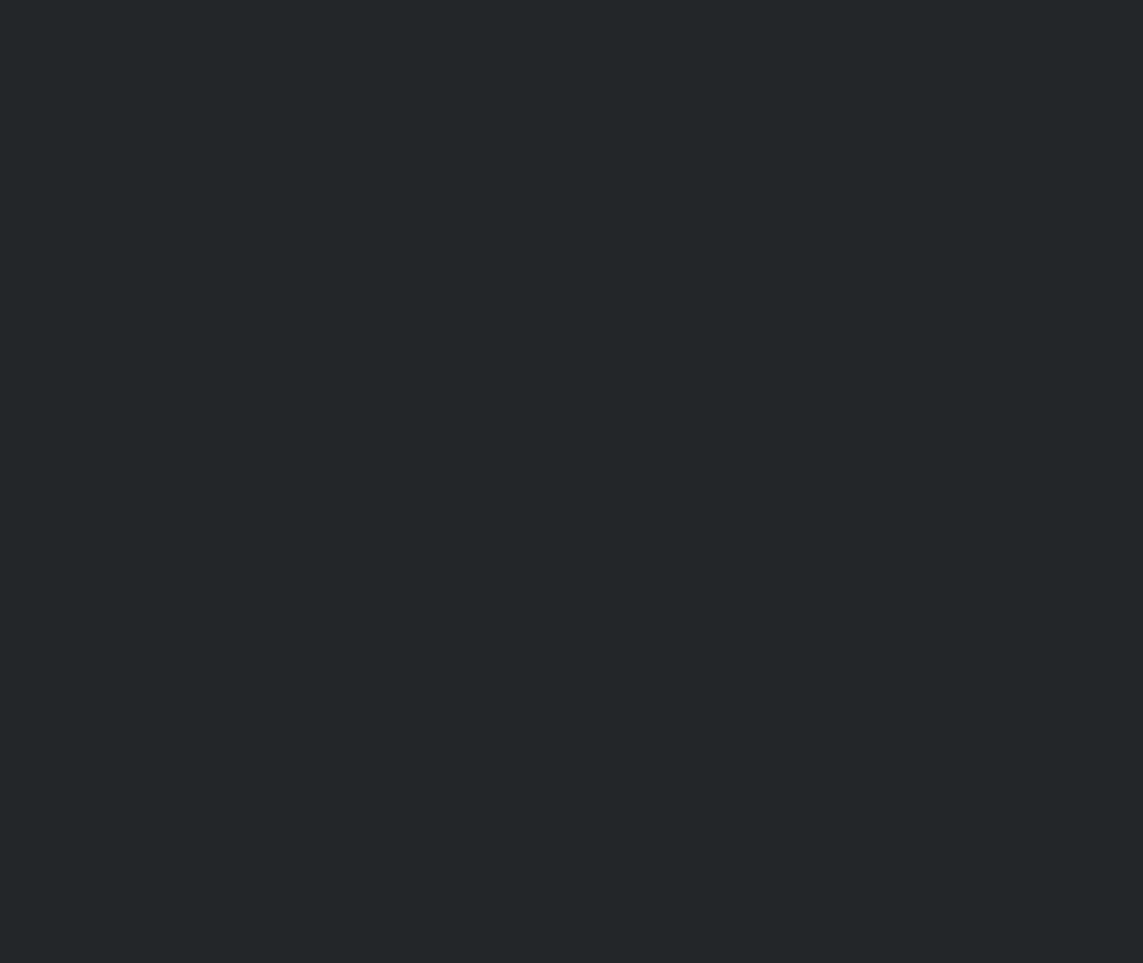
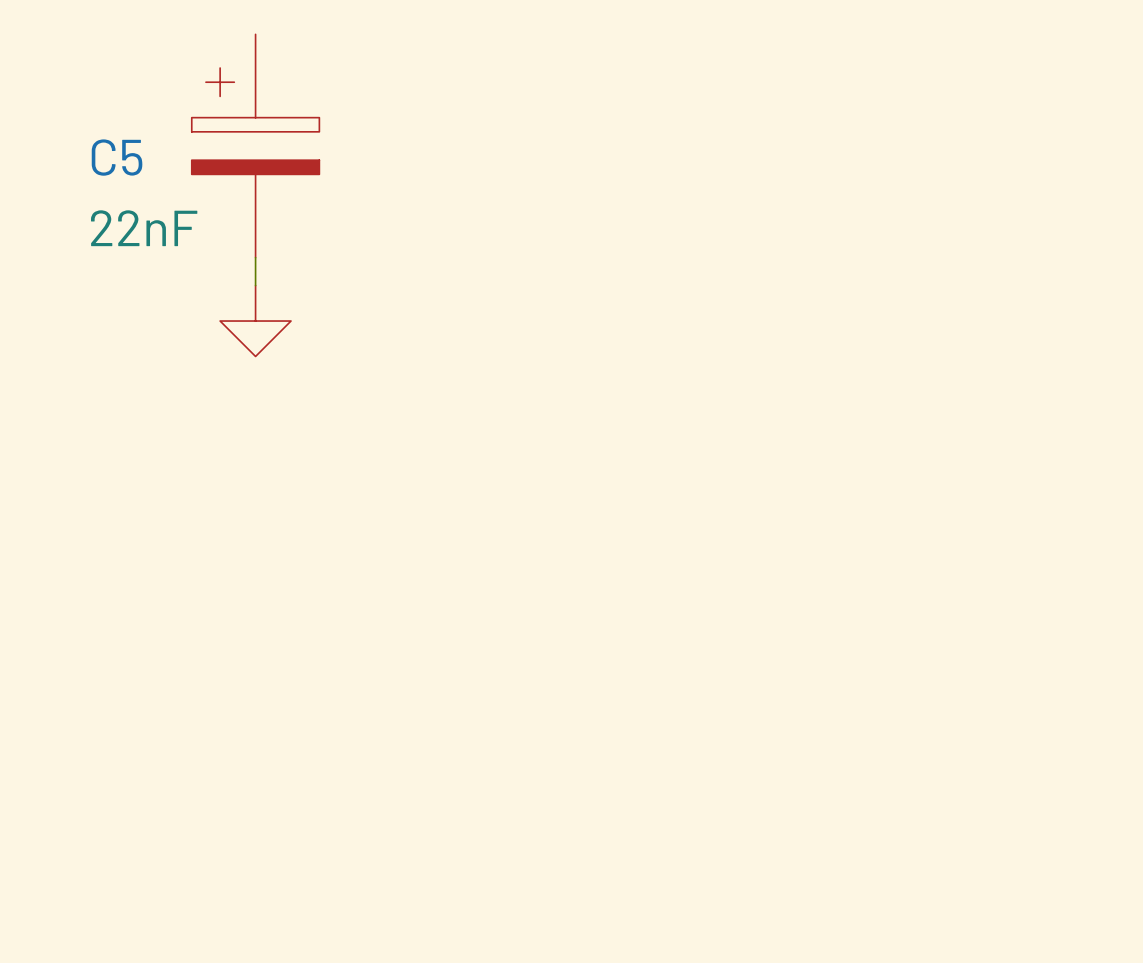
C5: none -> 22nF (255, 146)
wire: none -> (255, 257) (255, 285)
power symbol: none -> (255, 321)

